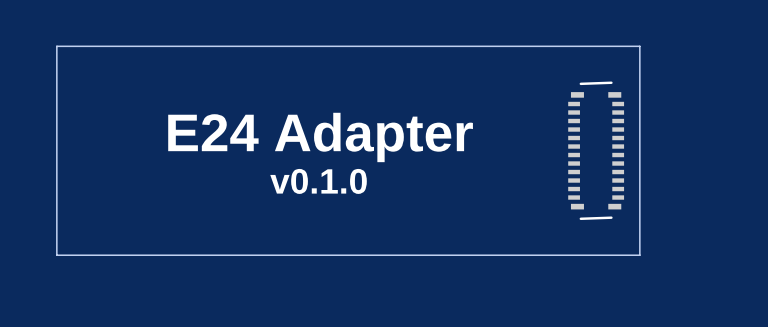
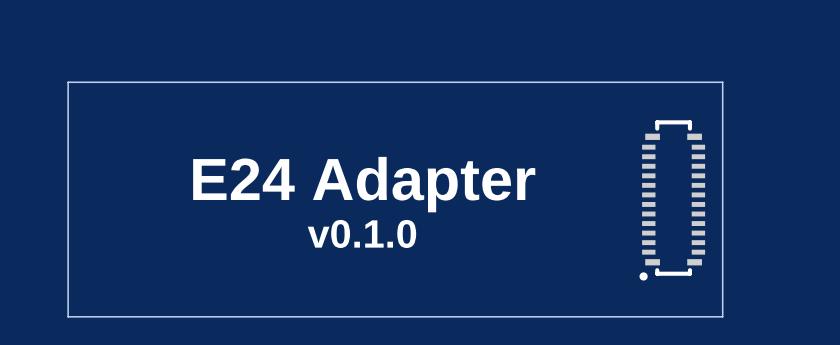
part footprint: [568, 81, 625, 221] -> [639, 120, 706, 281]

